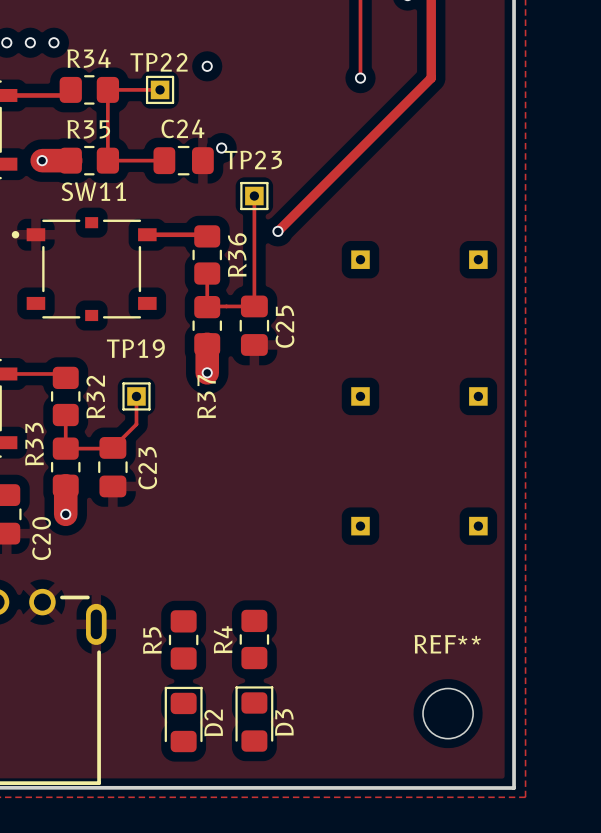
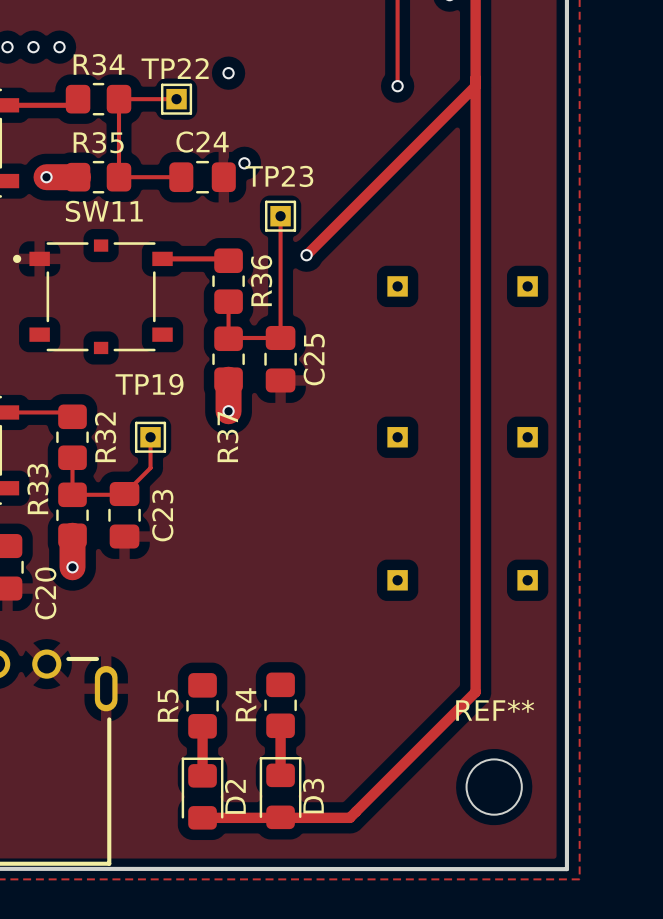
track: none -> (475, 86) (475, 692) (349, 817) (202, 817)
track: none -> (202, 726) (202, 775)
track: none -> (280, 725) (280, 775)

